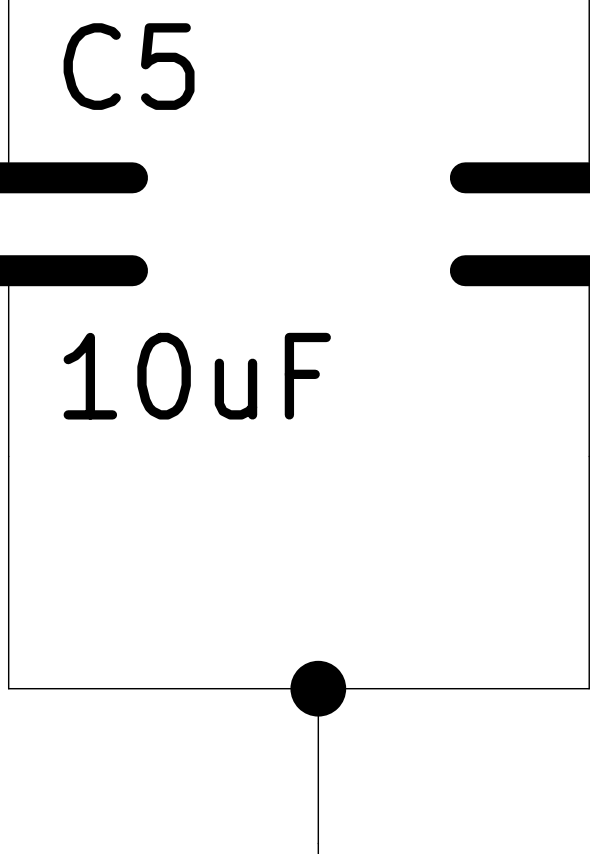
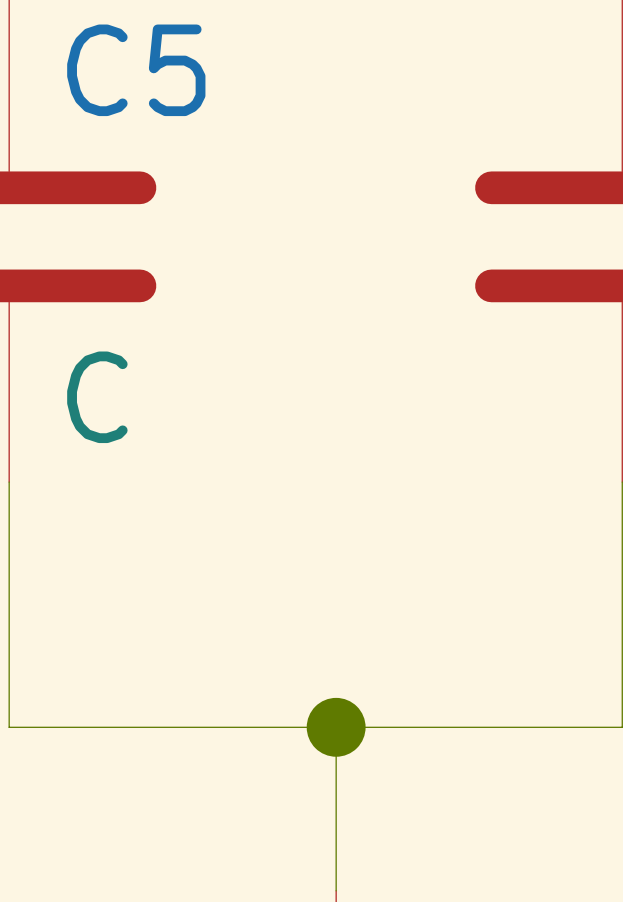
C5 value: 10uF (197, 376) -> C (97, 397)

